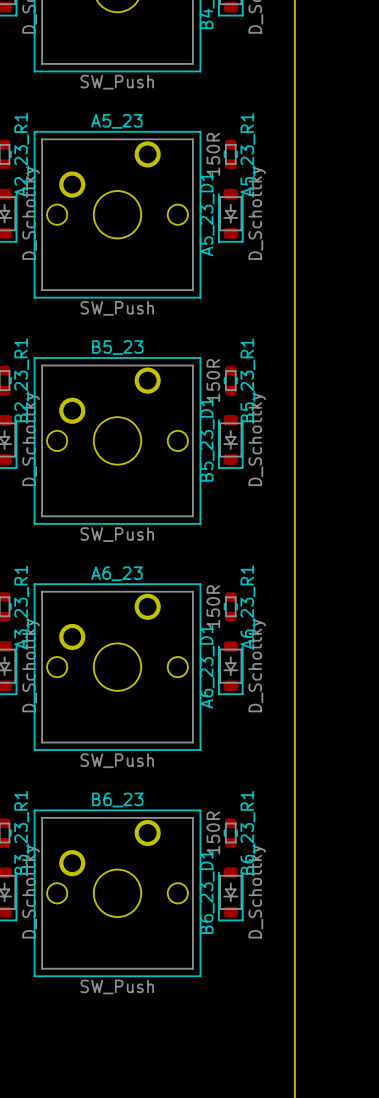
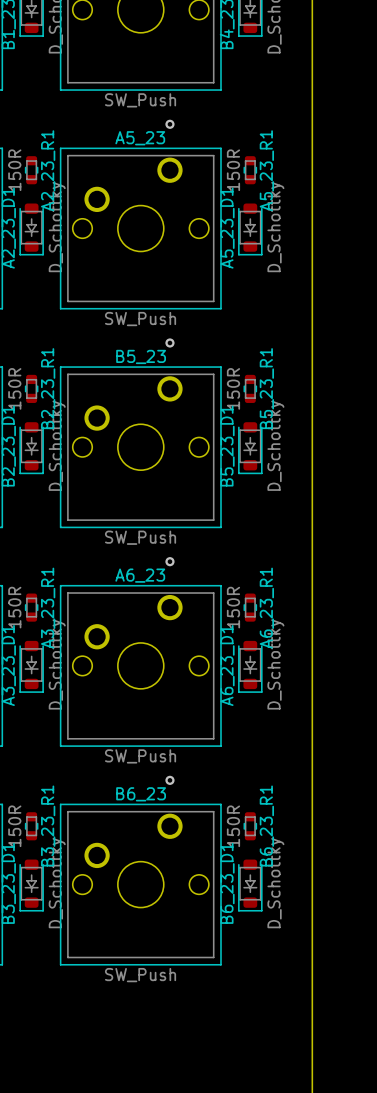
via: none -> (169, 124)
via: none -> (169, 342)
via: none -> (169, 561)
via: none -> (169, 780)

